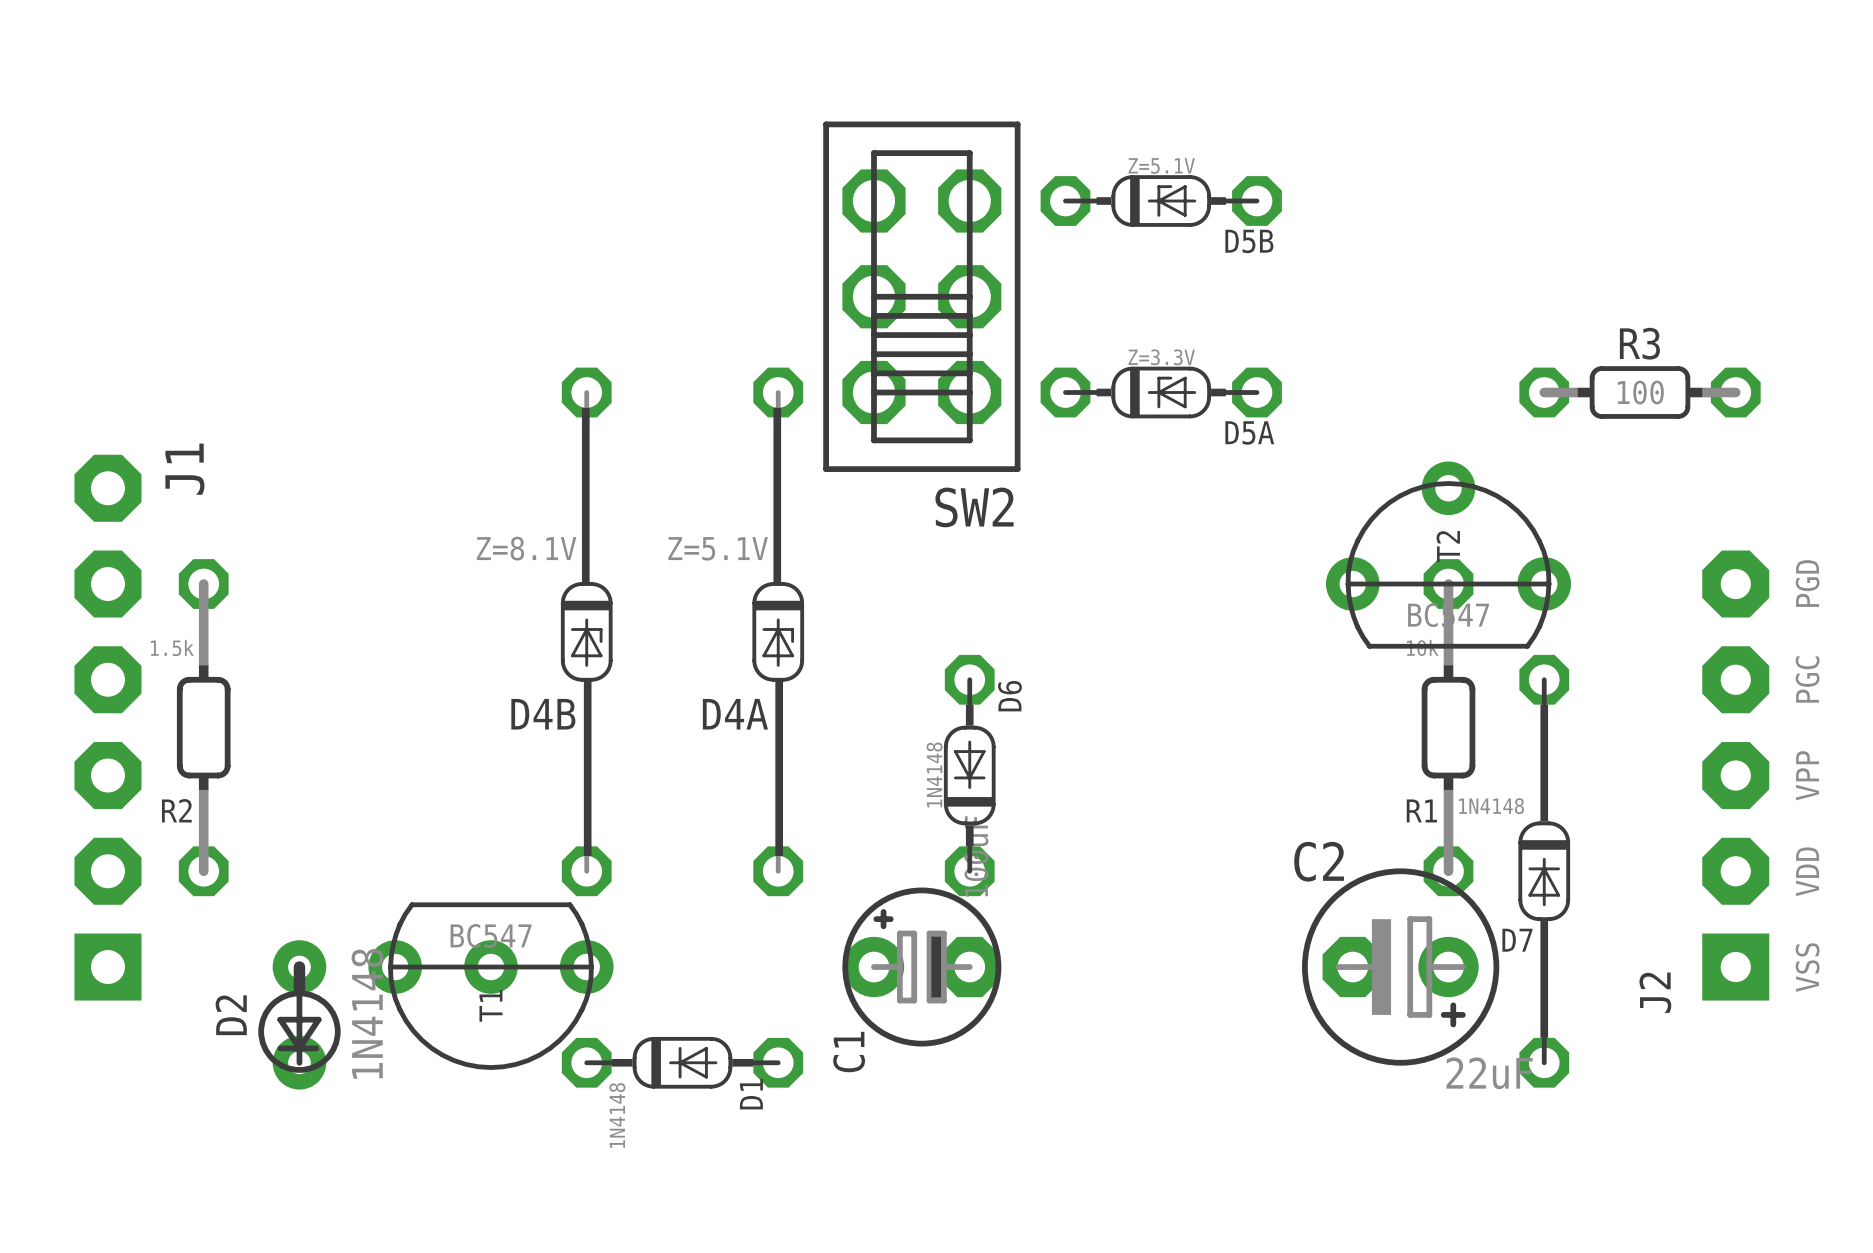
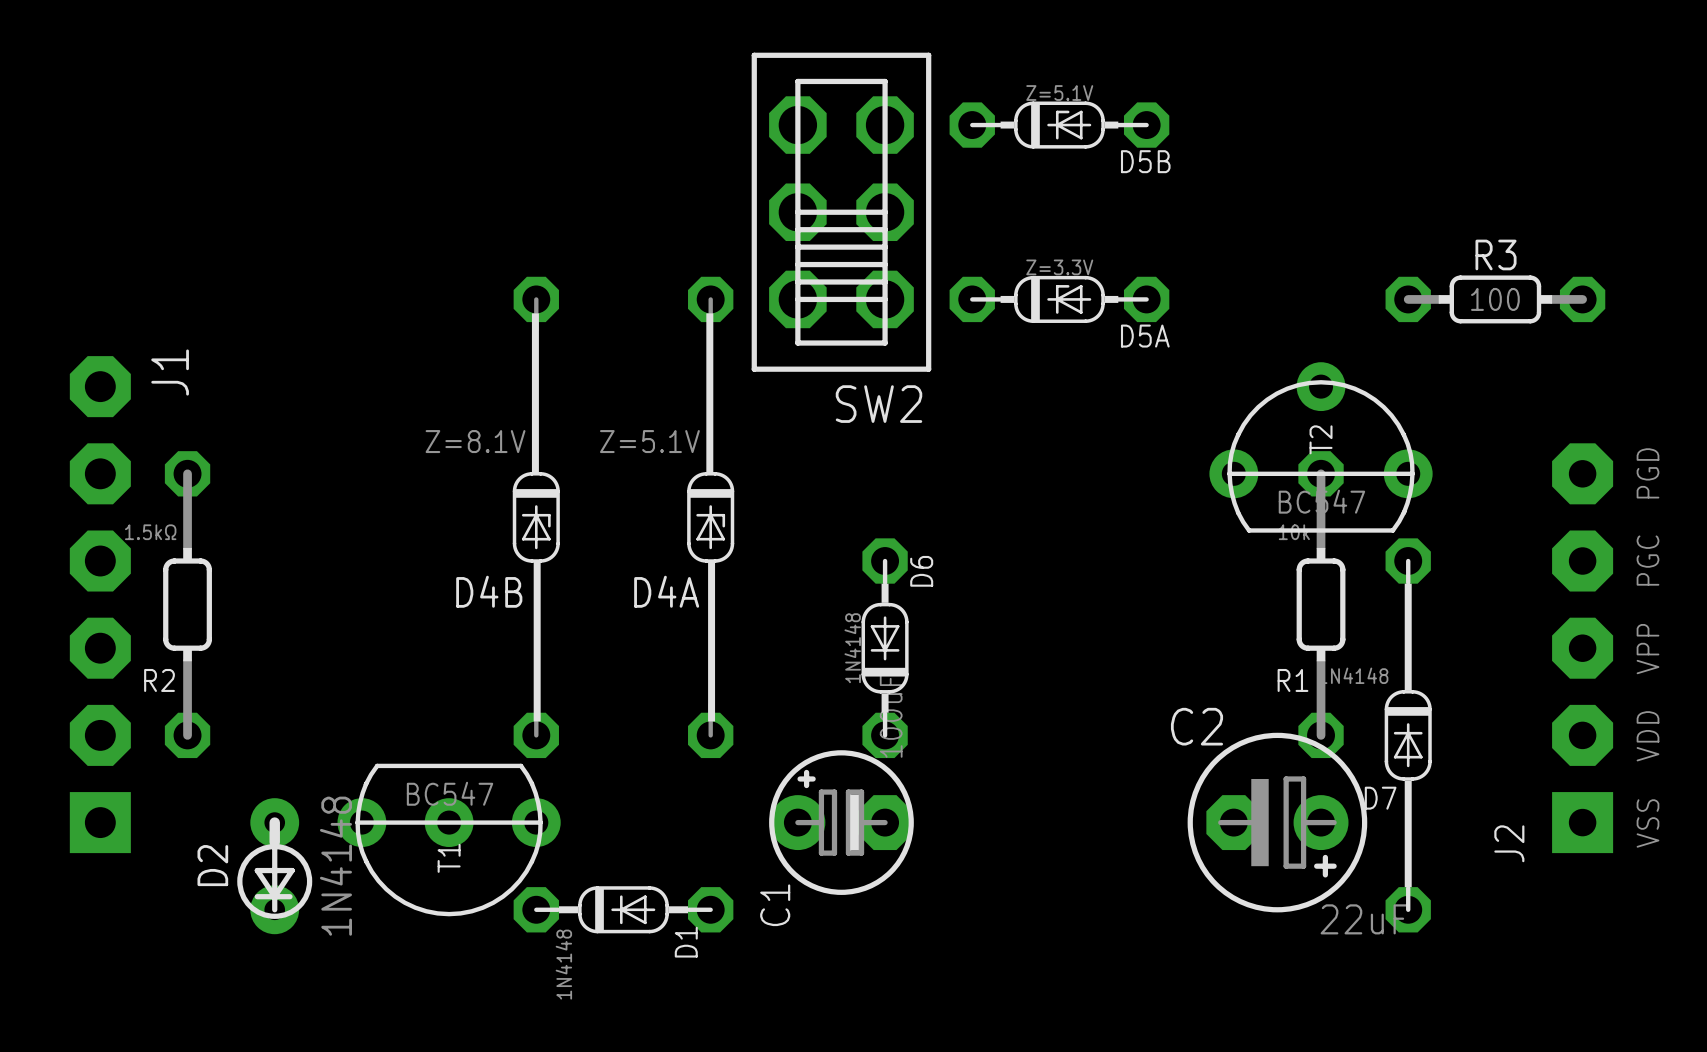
R2 value: 1.5k (172, 647) -> 1.5kΩ (150, 532)

